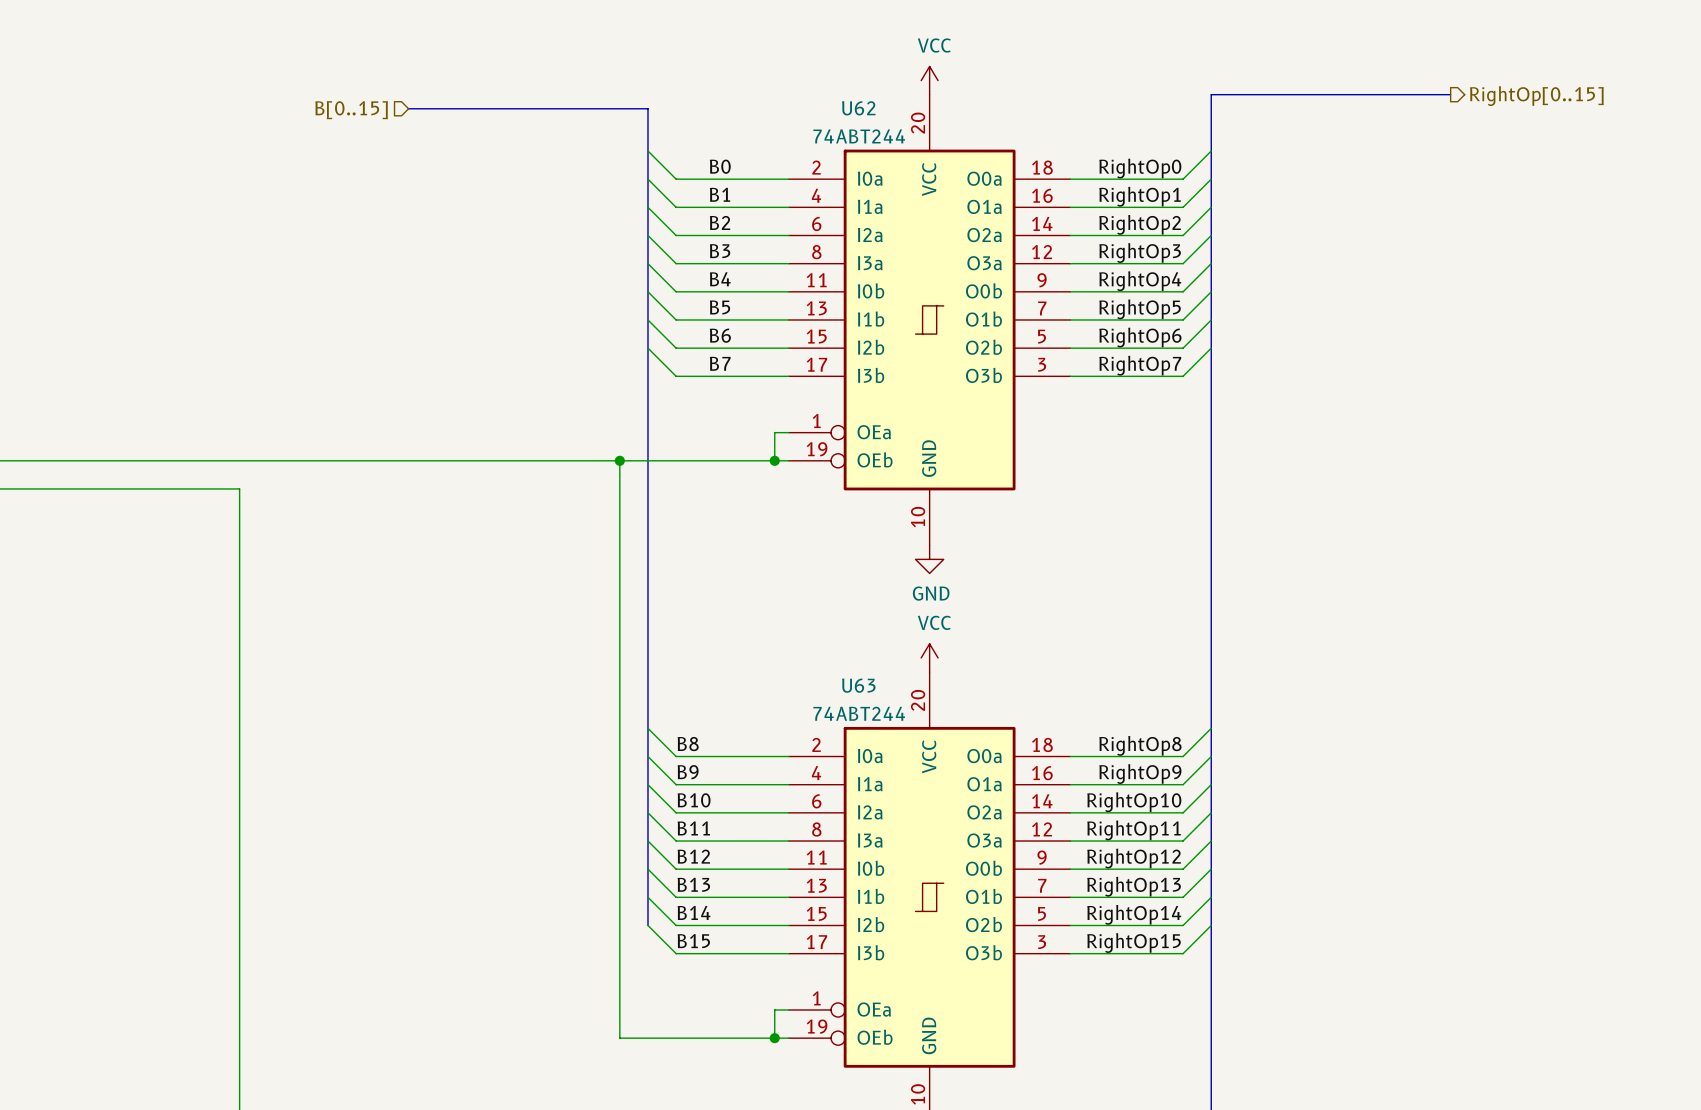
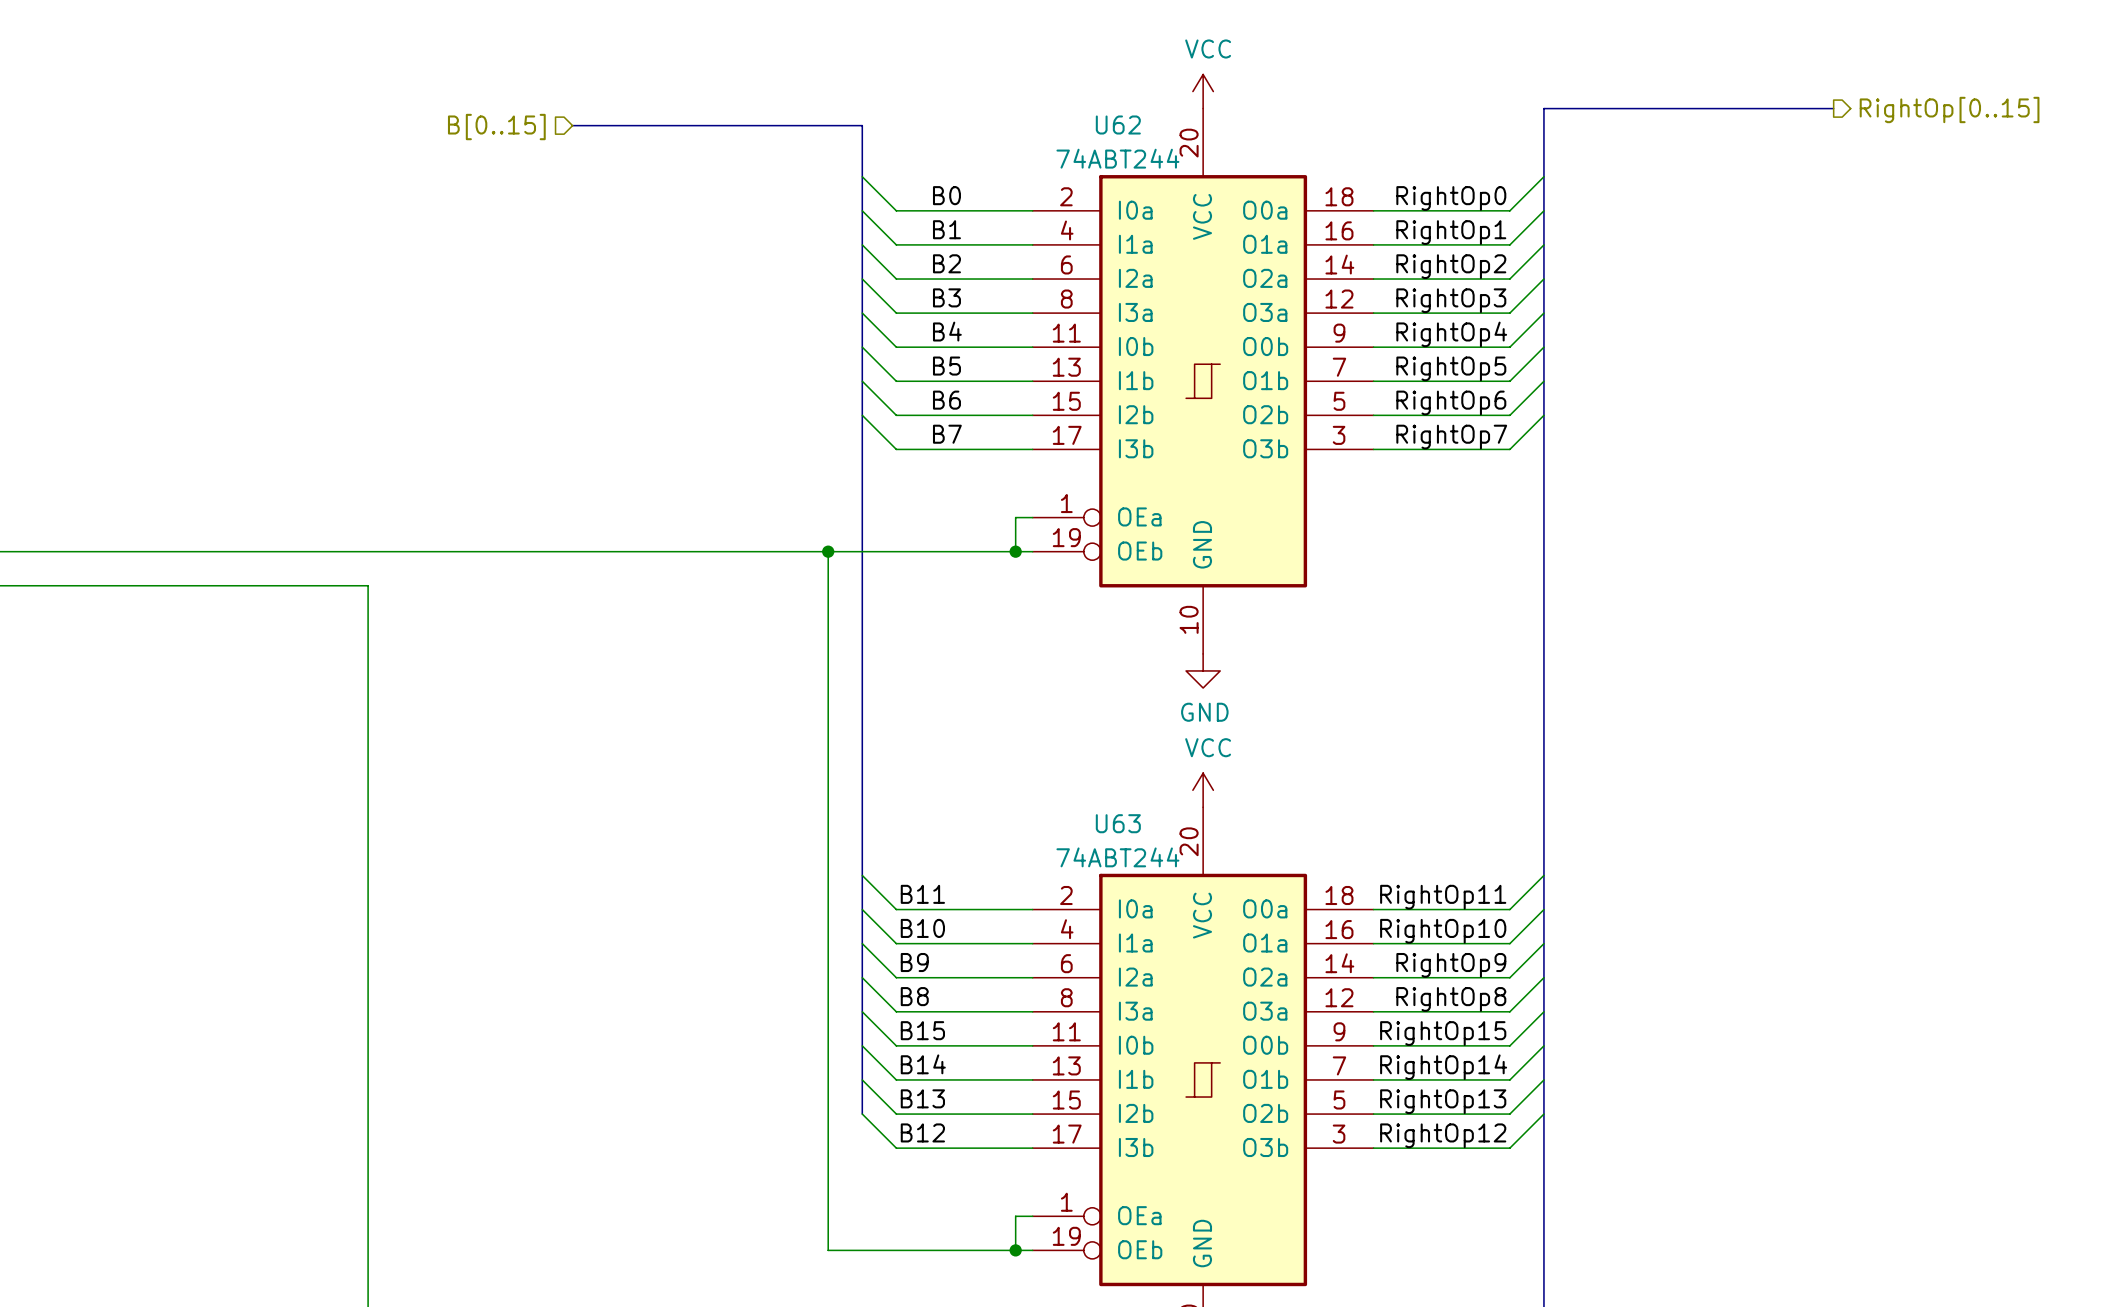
label: B8 (688, 744) -> B11 (922, 894)
label: RightOp8 (1140, 745) -> RightOp11 (1443, 897)
label: B9 (688, 772) -> B10 (922, 928)
label: RightOp9 (1140, 774) -> RightOp10 (1443, 931)
label: B10 (694, 800) -> B9 (914, 962)
label: RightOp10 (1134, 802) -> RightOp9 (1451, 965)
label: B11 (693, 828) -> B8 (914, 996)
label: RightOp11 (1134, 830) -> RightOp8 (1451, 999)
label: B12 (693, 856) -> B15 (922, 1030)
label: RightOp12 (1134, 858) -> RightOp15 (1443, 1033)
label: B13 (693, 884) -> B14 (923, 1064)
label: RightOp13 (1134, 886) -> RightOp14 (1443, 1067)
label: B14 (694, 912) -> B13 (922, 1098)
label: RightOp14 (1134, 914) -> RightOp13 (1443, 1101)
label: B15 (693, 941) -> B12 (922, 1132)
label: RightOp15 (1134, 943) -> RightOp12 (1443, 1135)

